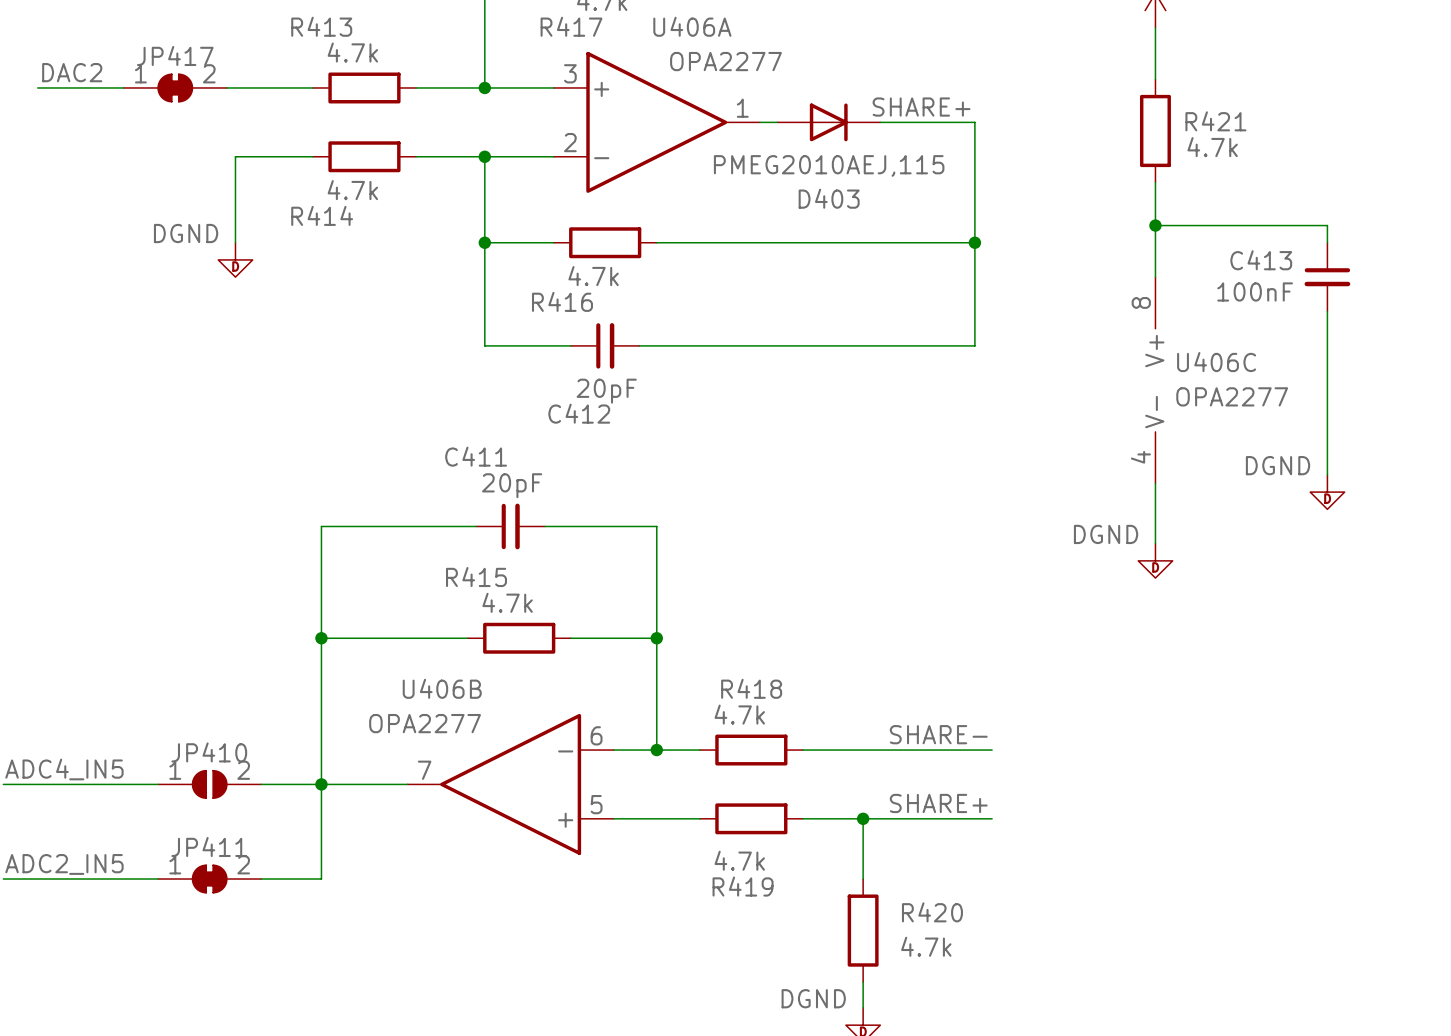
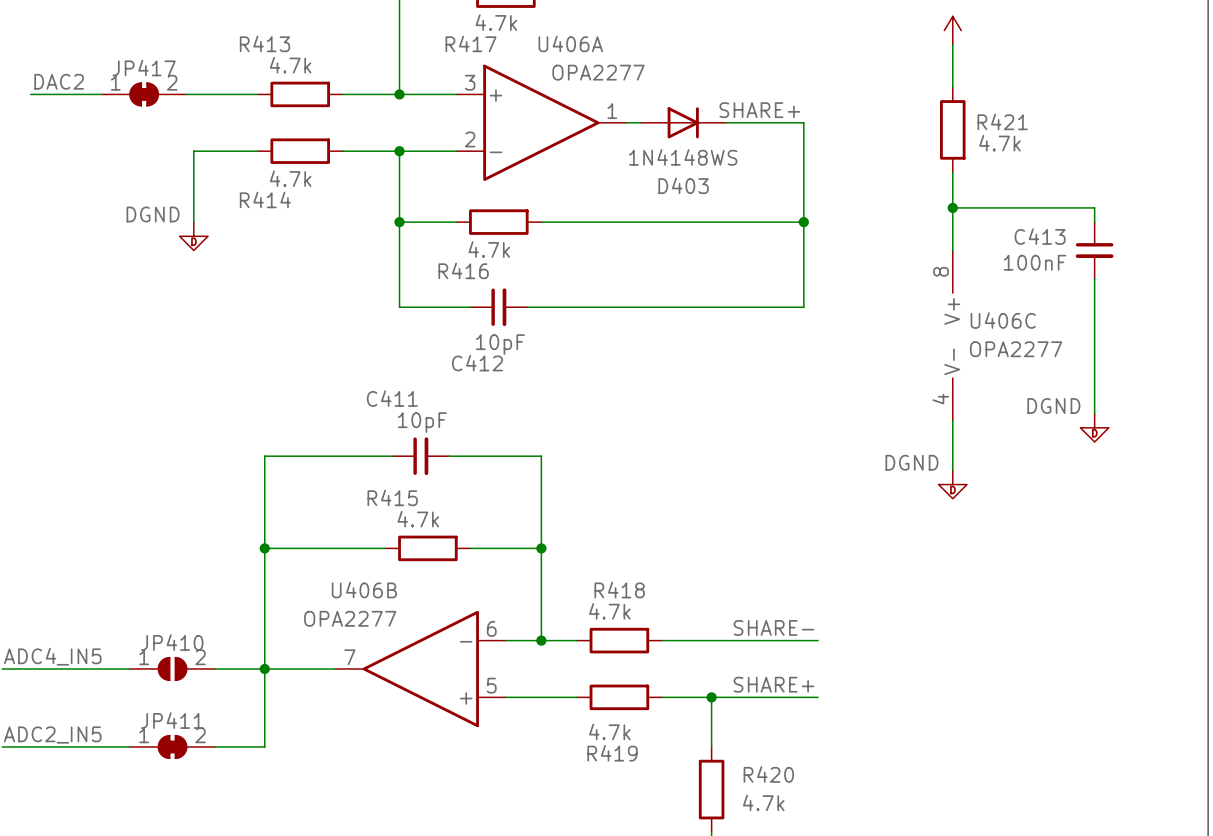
D403 value: PMEG2010AEJ,115 (829, 165) -> 1N4148WS (683, 157)
C412 value: 20pF (606, 391) -> 10pF (500, 344)
C411 value: 20pF (512, 485) -> 10pF (422, 422)

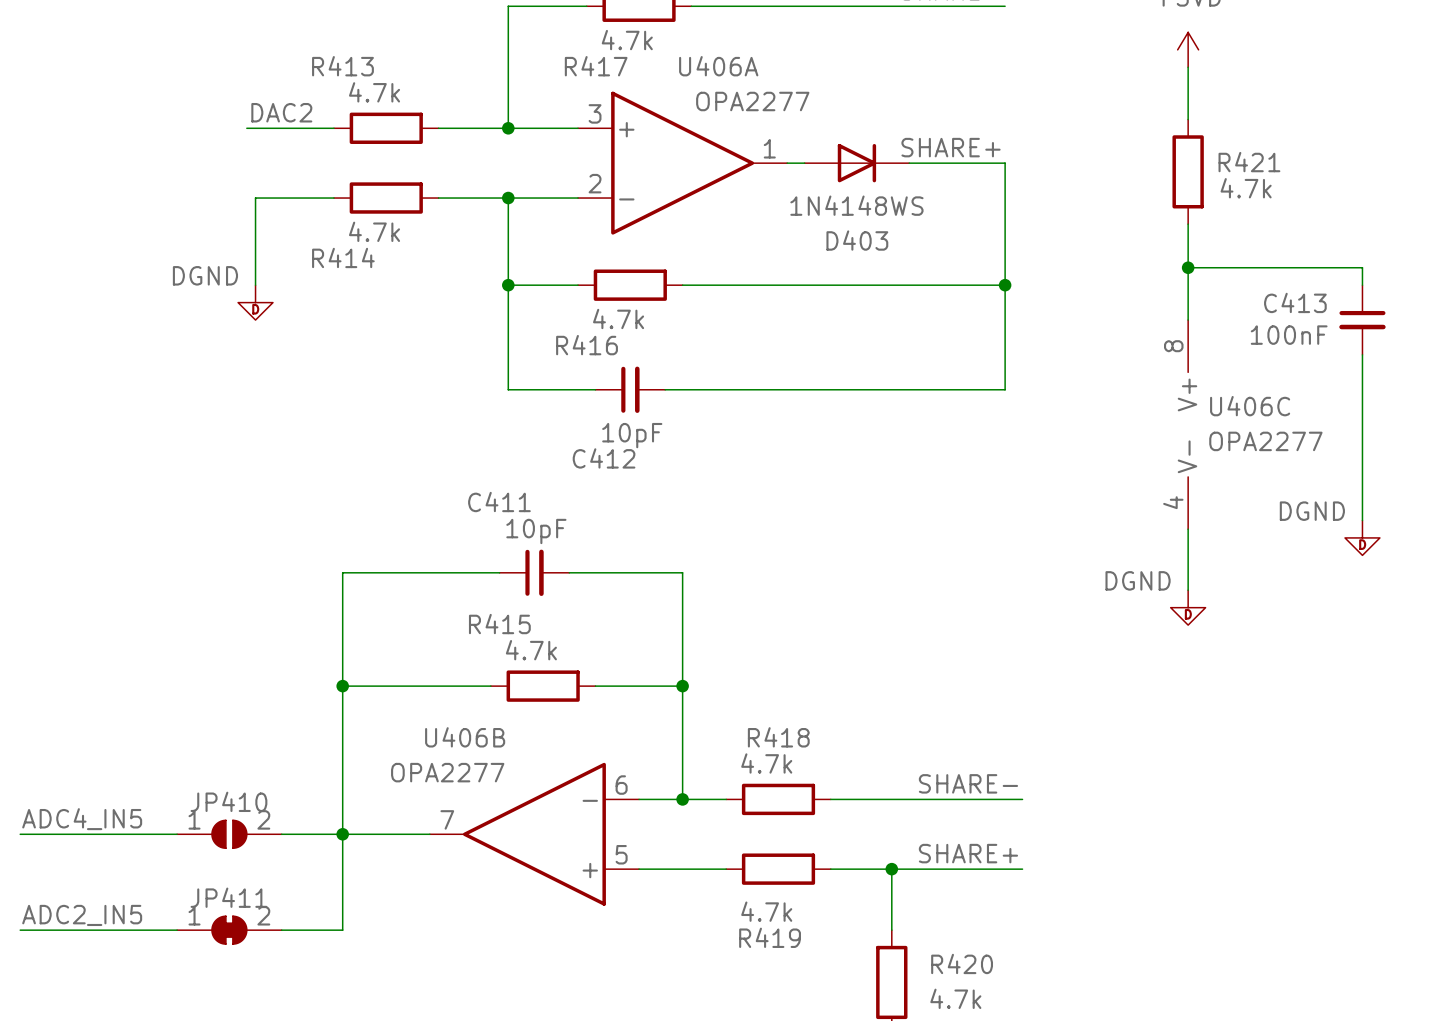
label position: DAC2 (59, 81) -> DAC2 (281, 112)
wire: (30, 94) (101, 94) -> none
JP417: (144, 94) -> none

